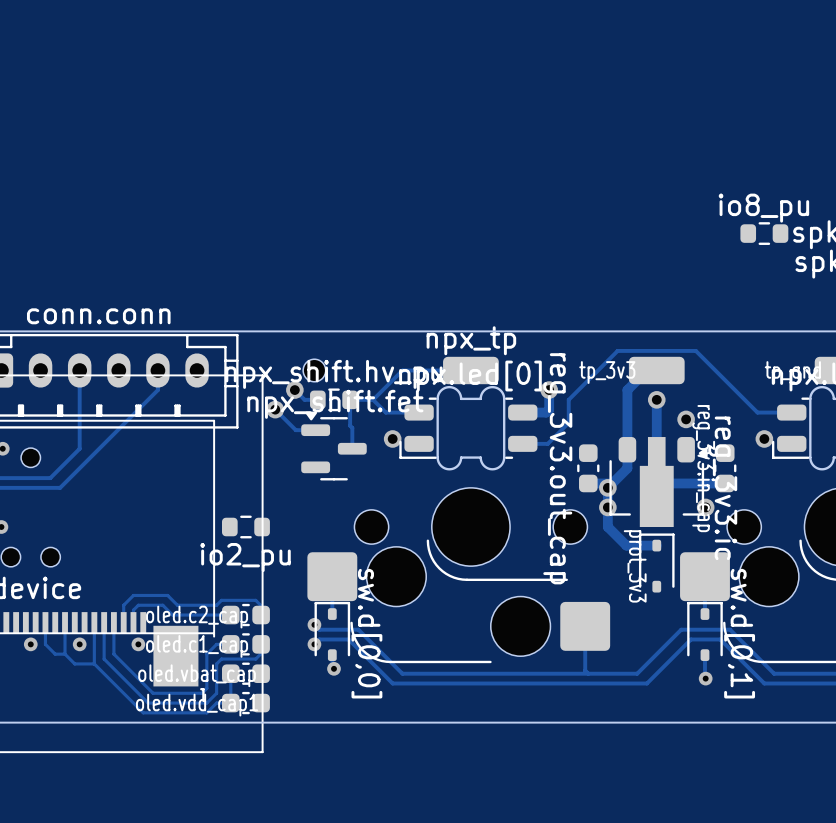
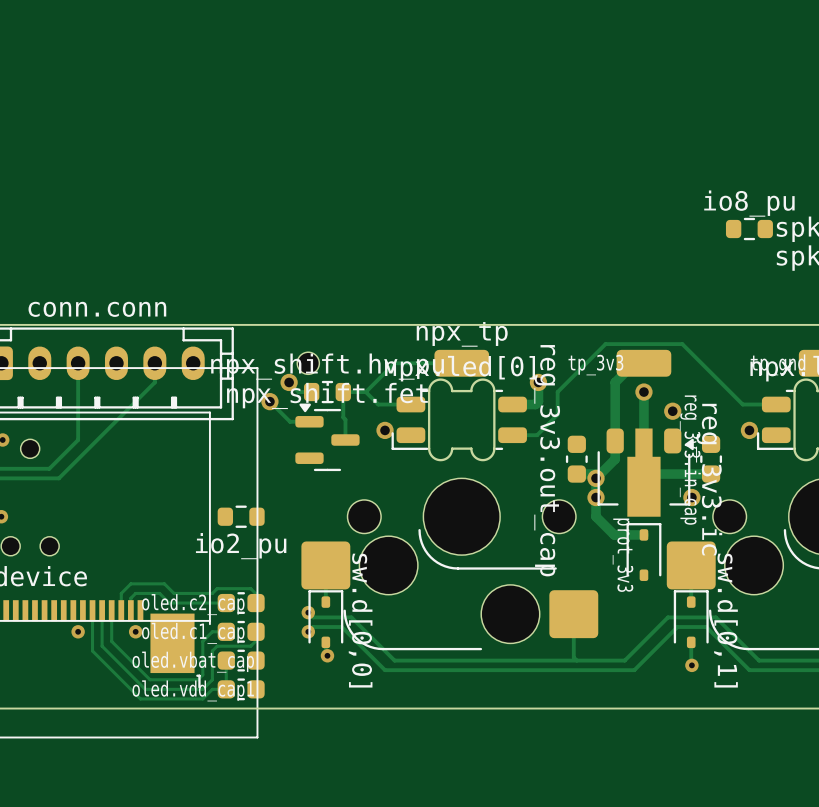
track: (45, 622) (45, 644) (55, 654) (65, 654) -> none
track: (65, 622) (65, 654) -> none
via: (30, 644) -> none
track: (65, 654) (74, 663) (94, 663) -> none

